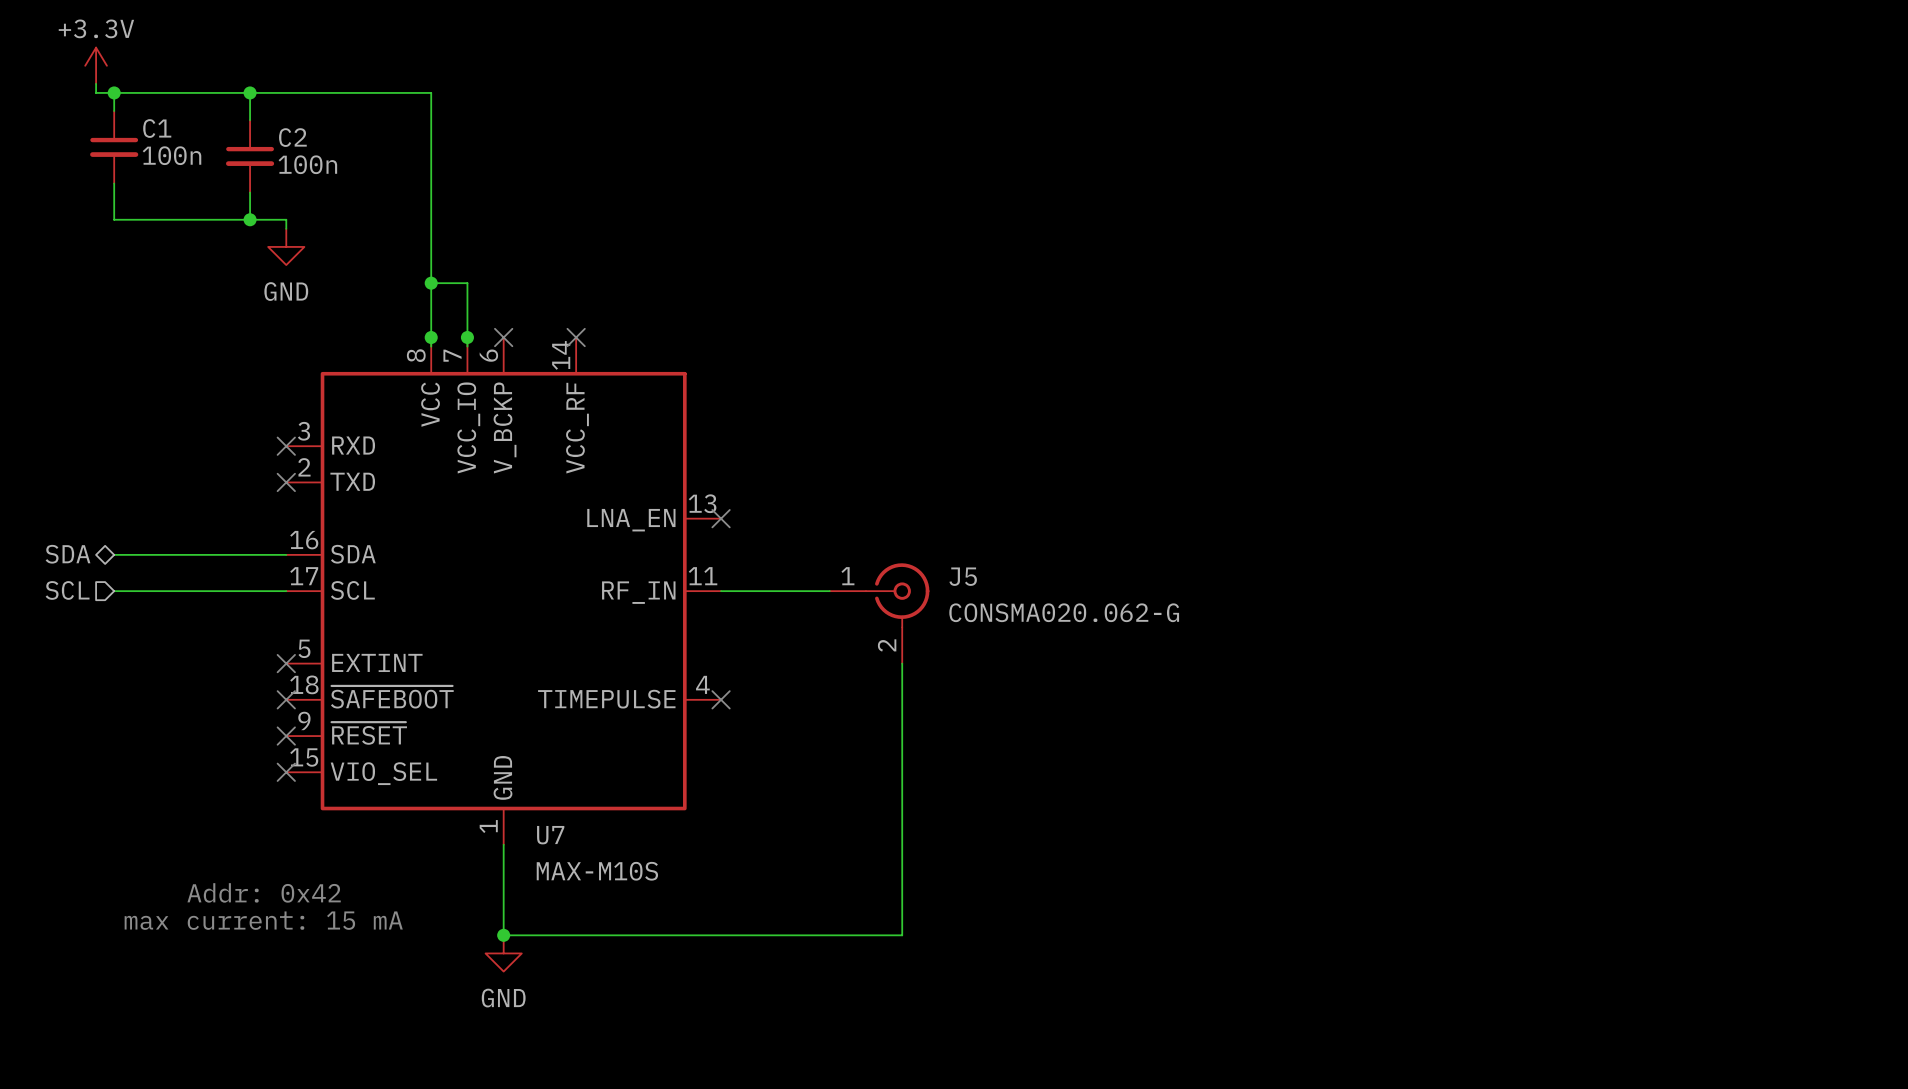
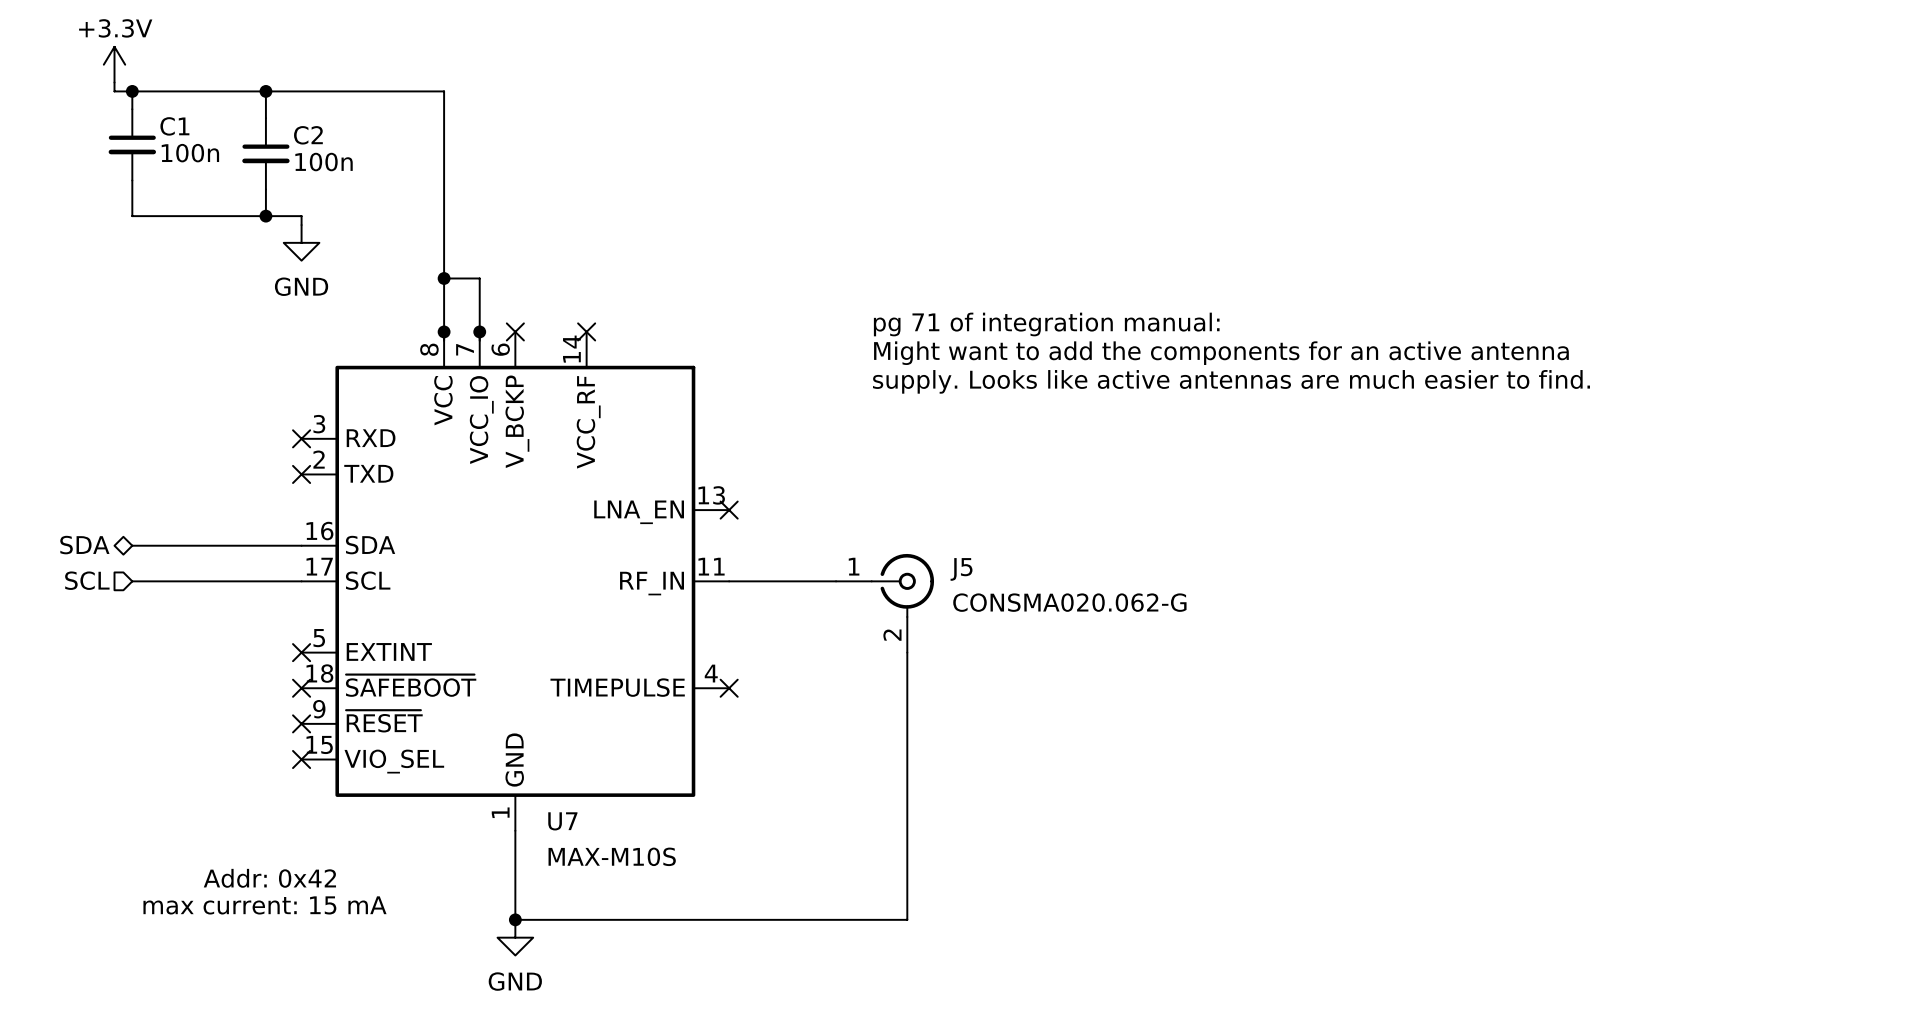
text: none -> pg 71 of integration manual: (1046, 324)
text: none -> Might want to add the components for an active antenna (1221, 353)
text: none -> supply. Looks like active antennas are much easier to find. (1231, 381)

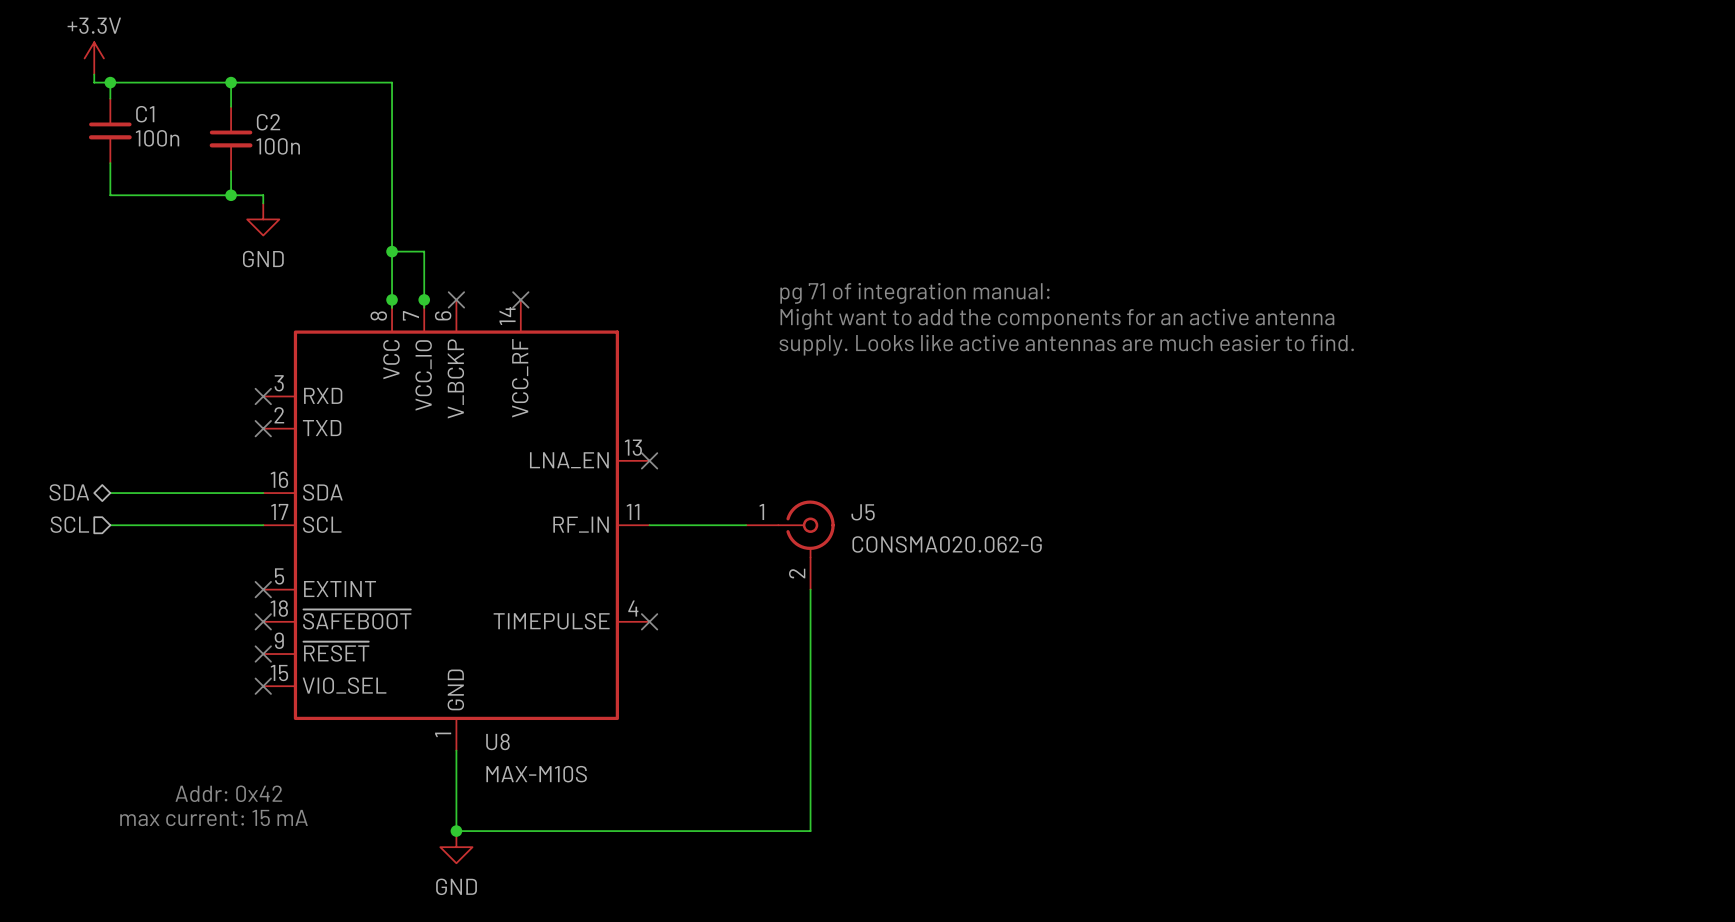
U7 name: U7 (562, 821) -> U8 (497, 741)

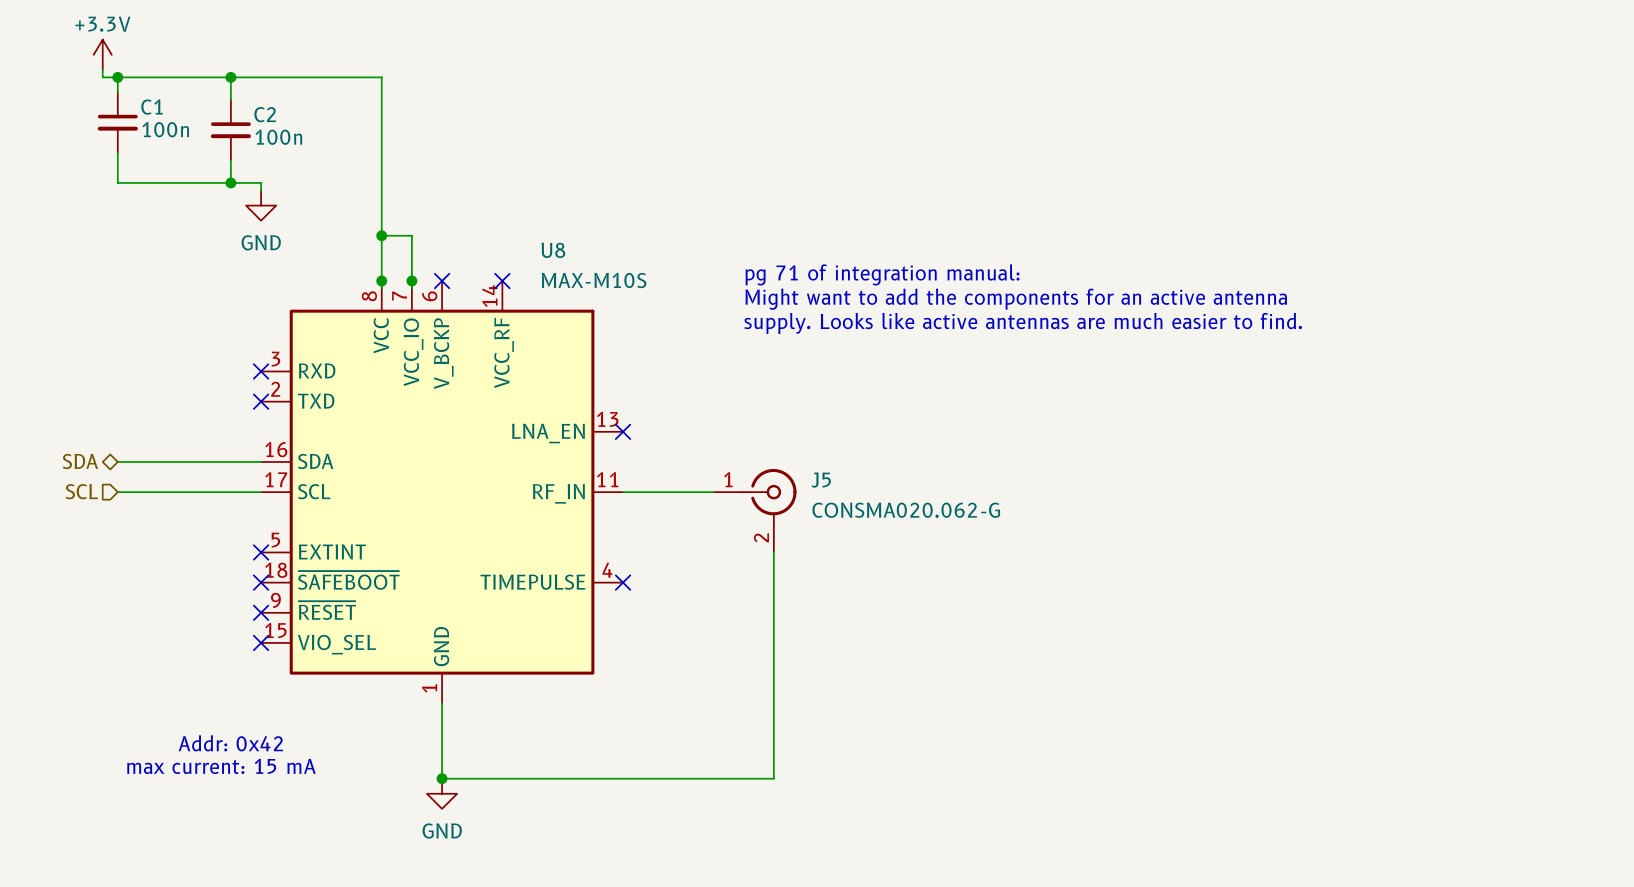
U8 name position: U8 (497, 741) -> U8 (553, 250)
U8 value position: MAX-M10S (536, 774) -> MAX-M10S (594, 280)

